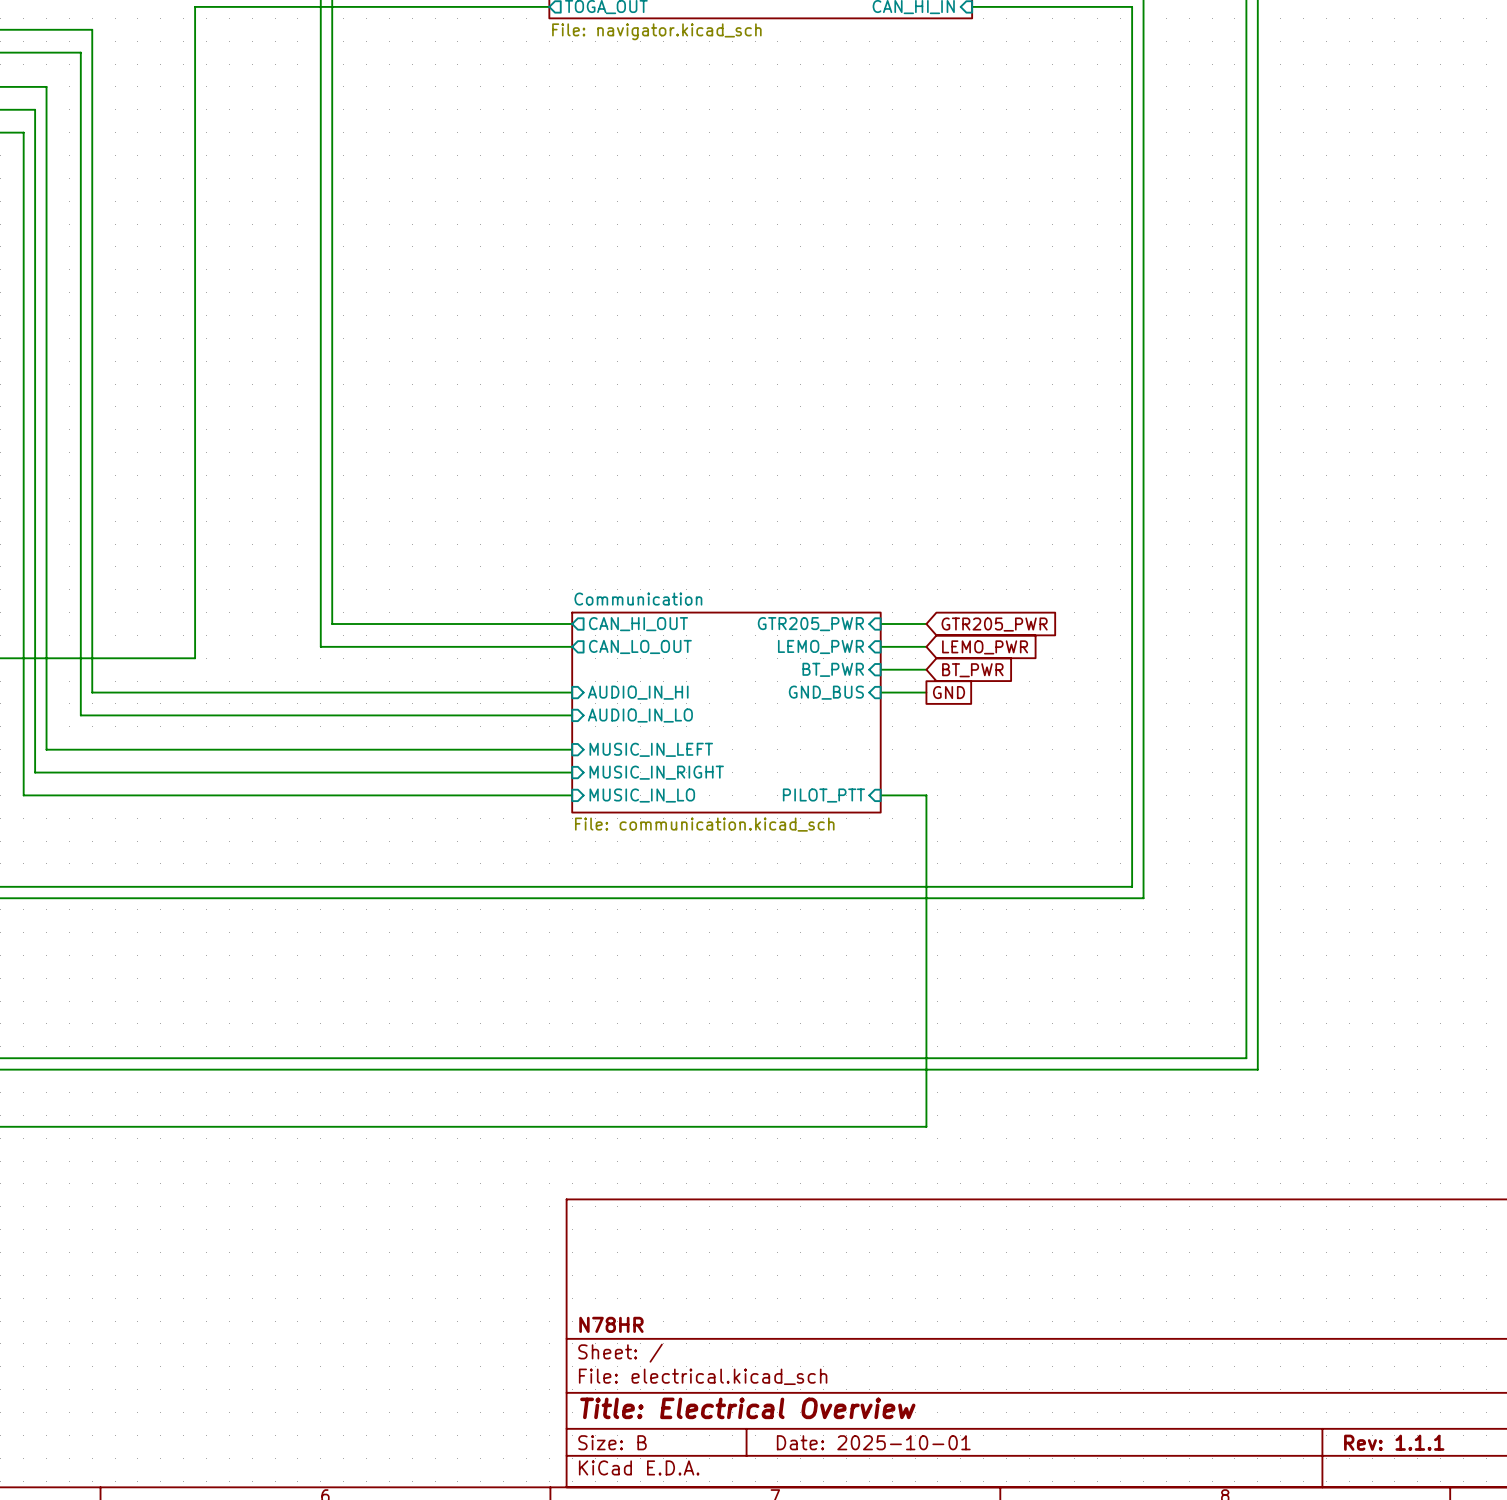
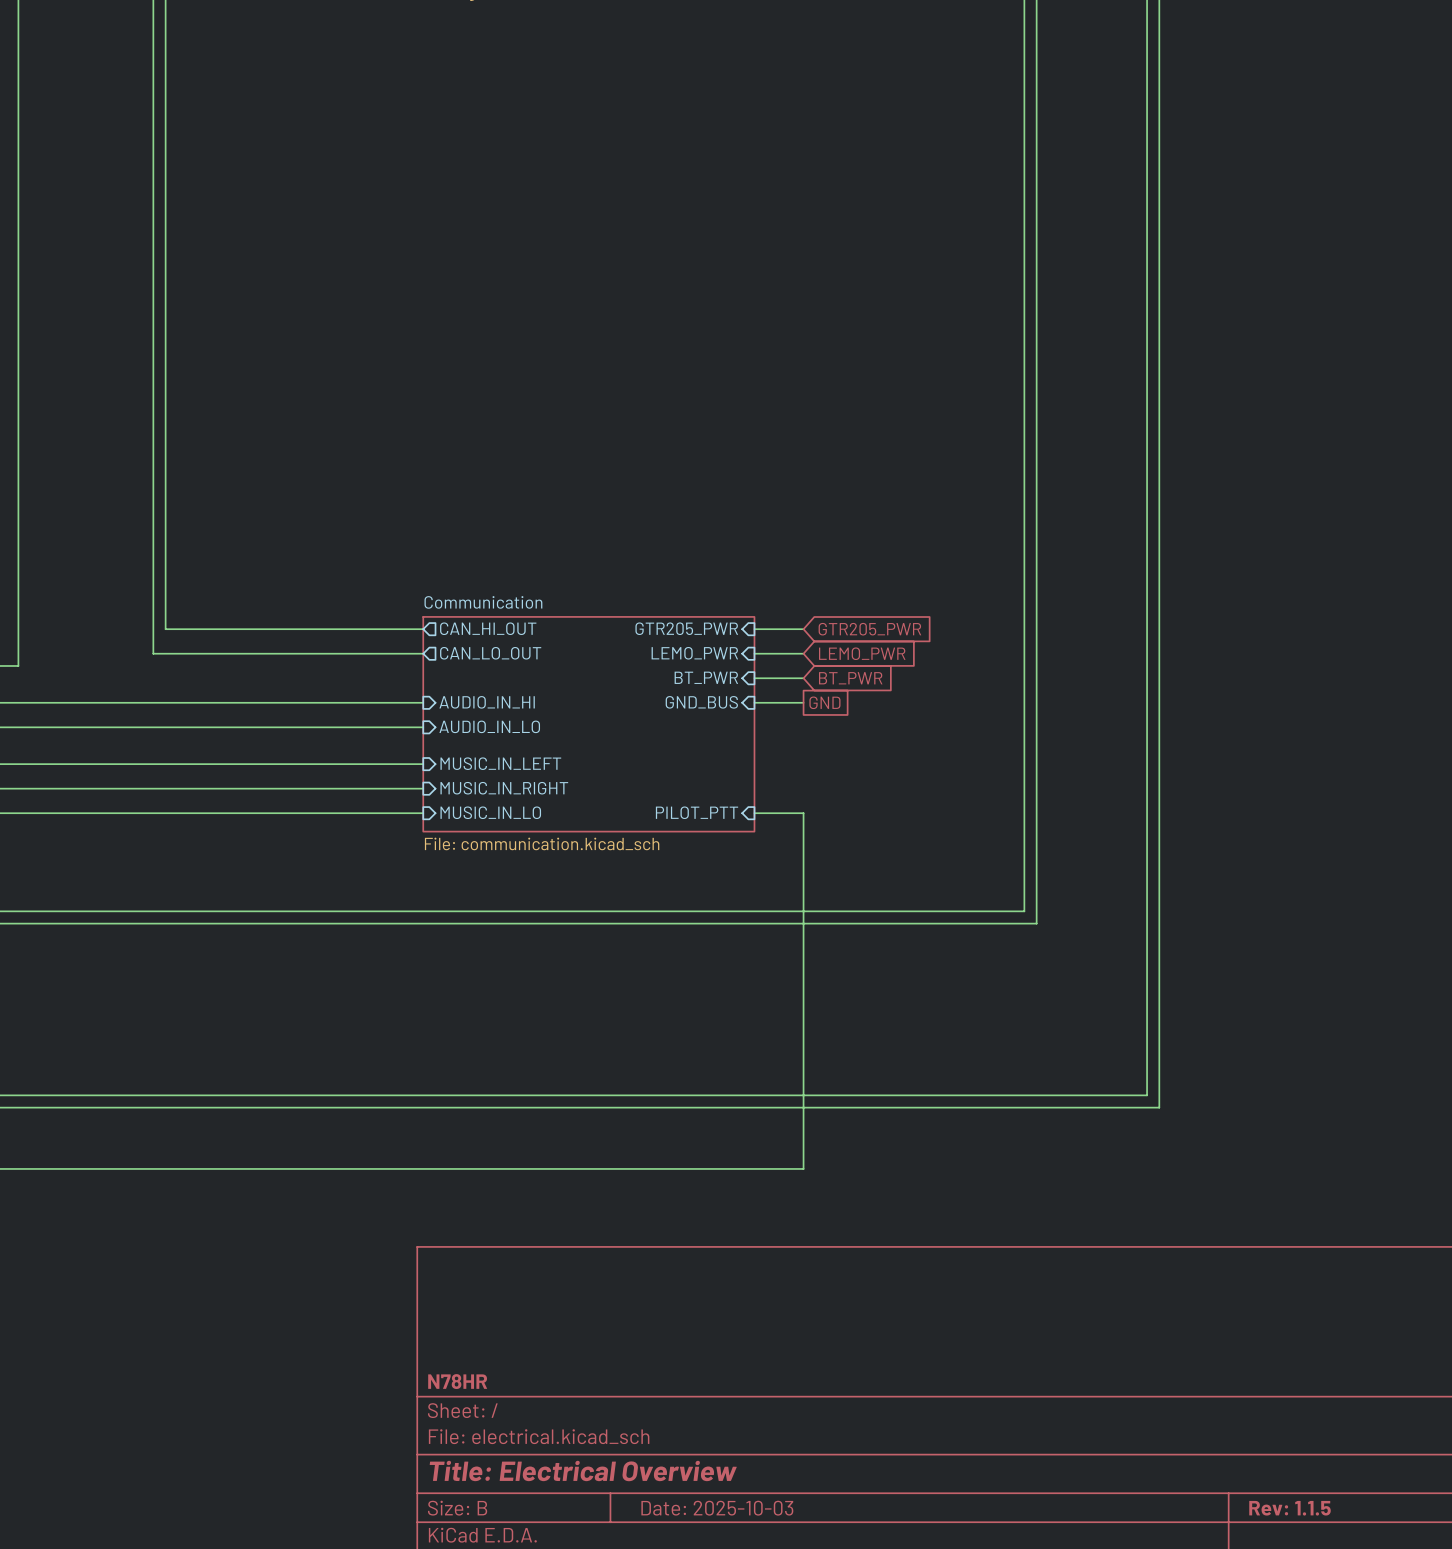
title block: Date: 2025-10-01 (873, 1442) -> Date: 2025-10-03 (717, 1508)
title block: Rev: 1.1.1 (1394, 1442) -> Rev: 1.1.5 (1290, 1508)

